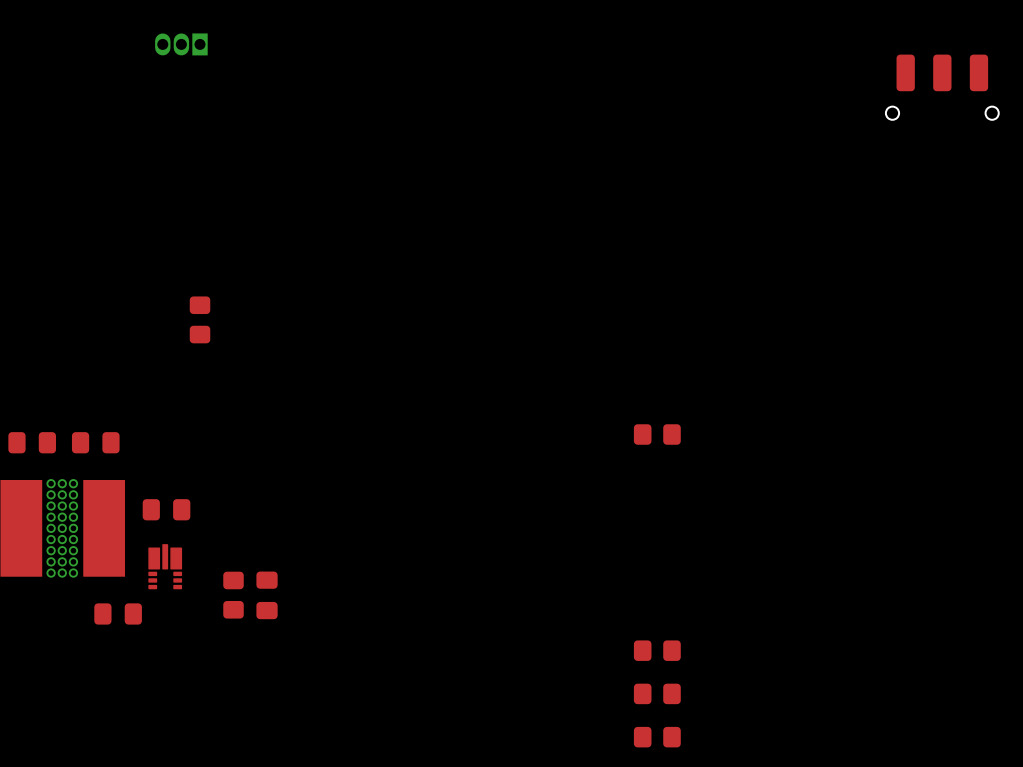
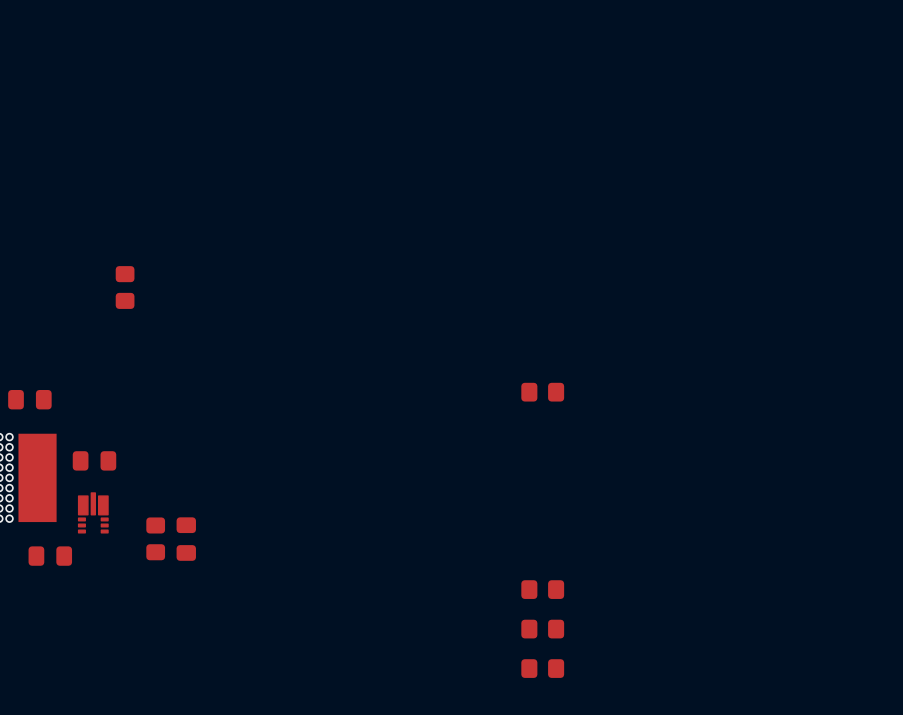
part: (181, 44) -> none
part: (942, 87) -> none

